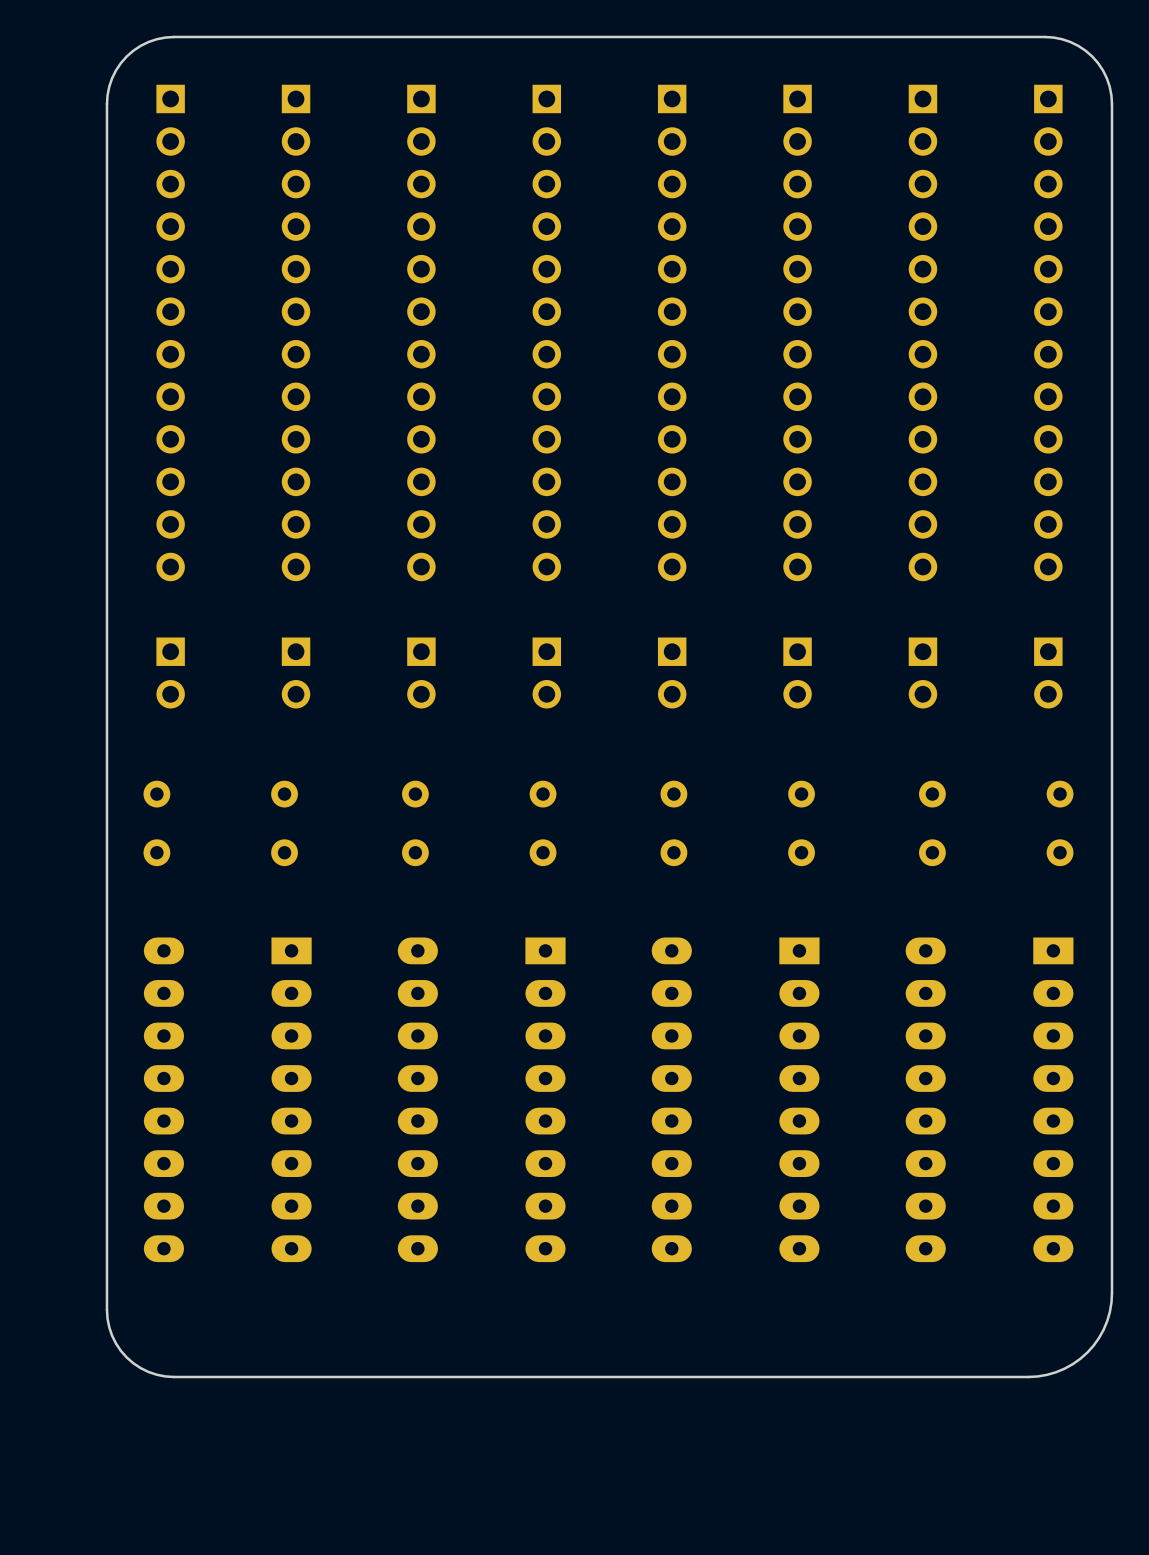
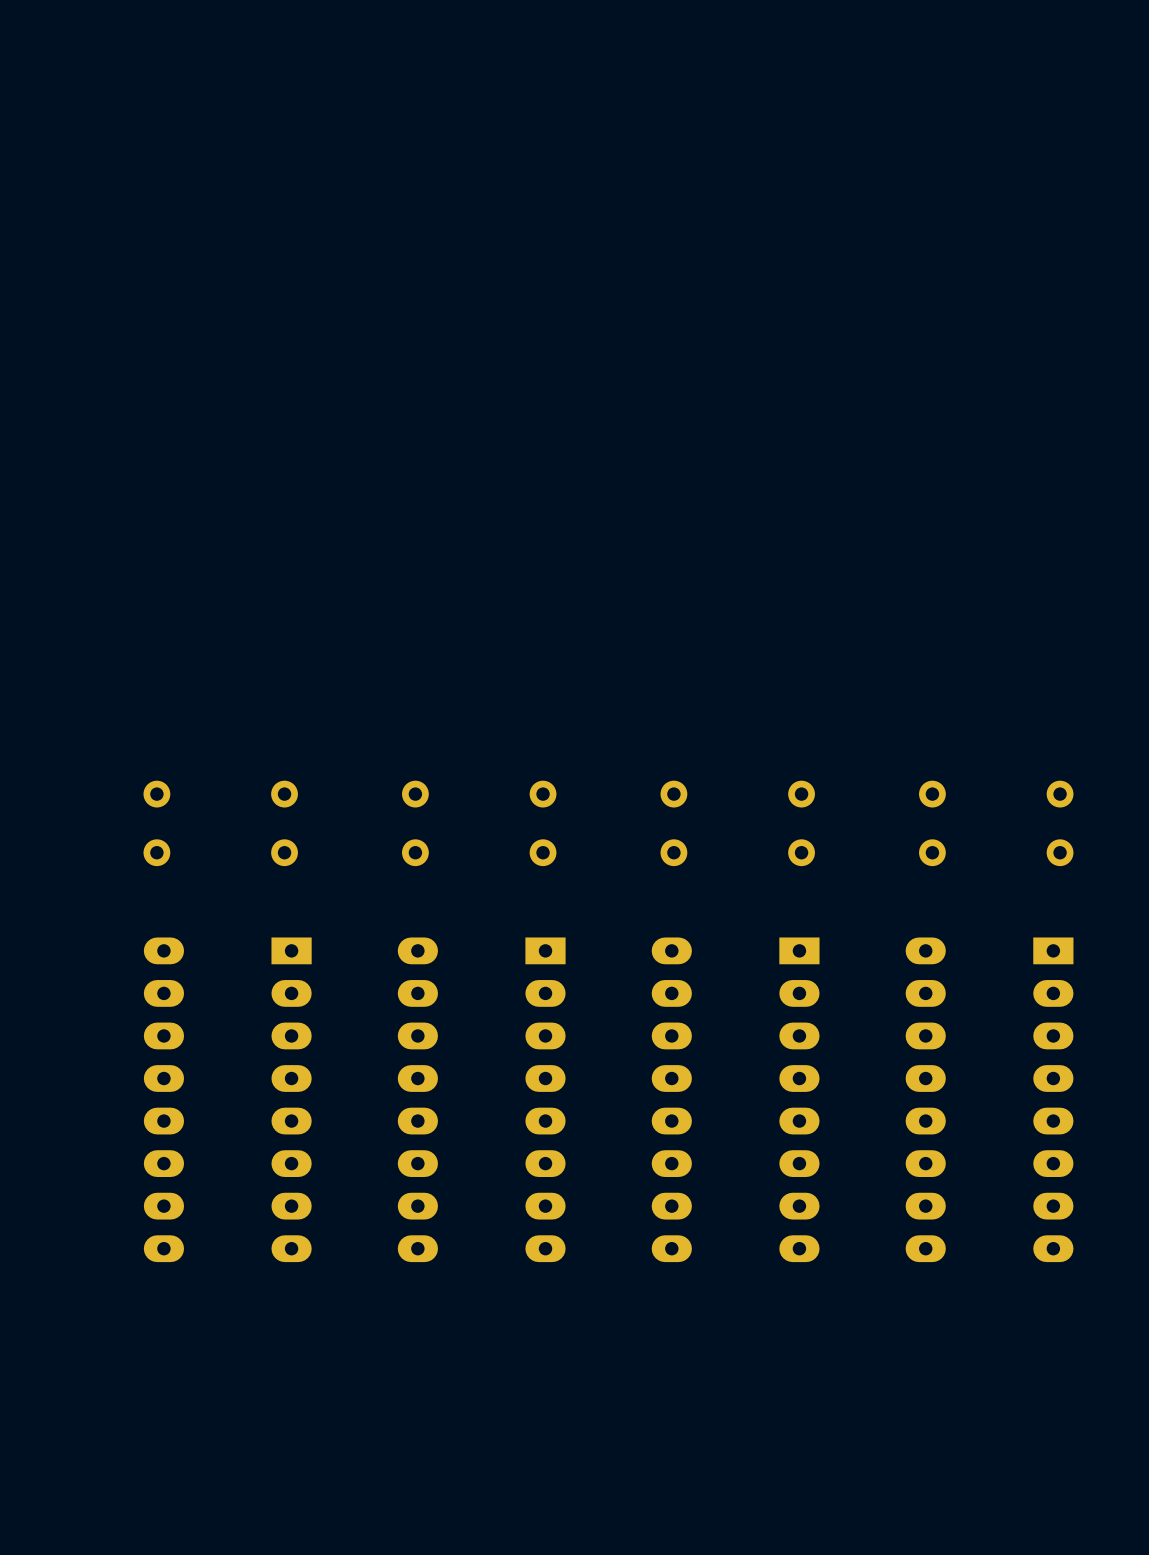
board edge: (1044, 36) (173, 36) (156, 39) (140, 45) (120, 63) (109, 86) (106, 103) (106, 1309) (112, 1335) (120, 1350) (133, 1363) (148, 1371) (173, 1376) (1028, 1376) (1046, 1374) (1064, 1368) (1087, 1352) (1099, 1337) (1109, 1311) (1111, 1293) (1111, 103) (1106, 78) (1092, 56) (1070, 42) (1044, 36) -> none
part: (170, 332) -> none
part: (296, 332) -> none
part: (421, 332) -> none
part: (546, 332) -> none
part: (672, 332) -> none
part: (797, 332) -> none
part: (922, 332) -> none
part: (1048, 332) -> none
part: (170, 672) -> none
part: (296, 672) -> none
part: (421, 672) -> none
part: (546, 672) -> none
part: (672, 672) -> none
part: (797, 672) -> none
part: (922, 672) -> none
part: (1048, 672) -> none

